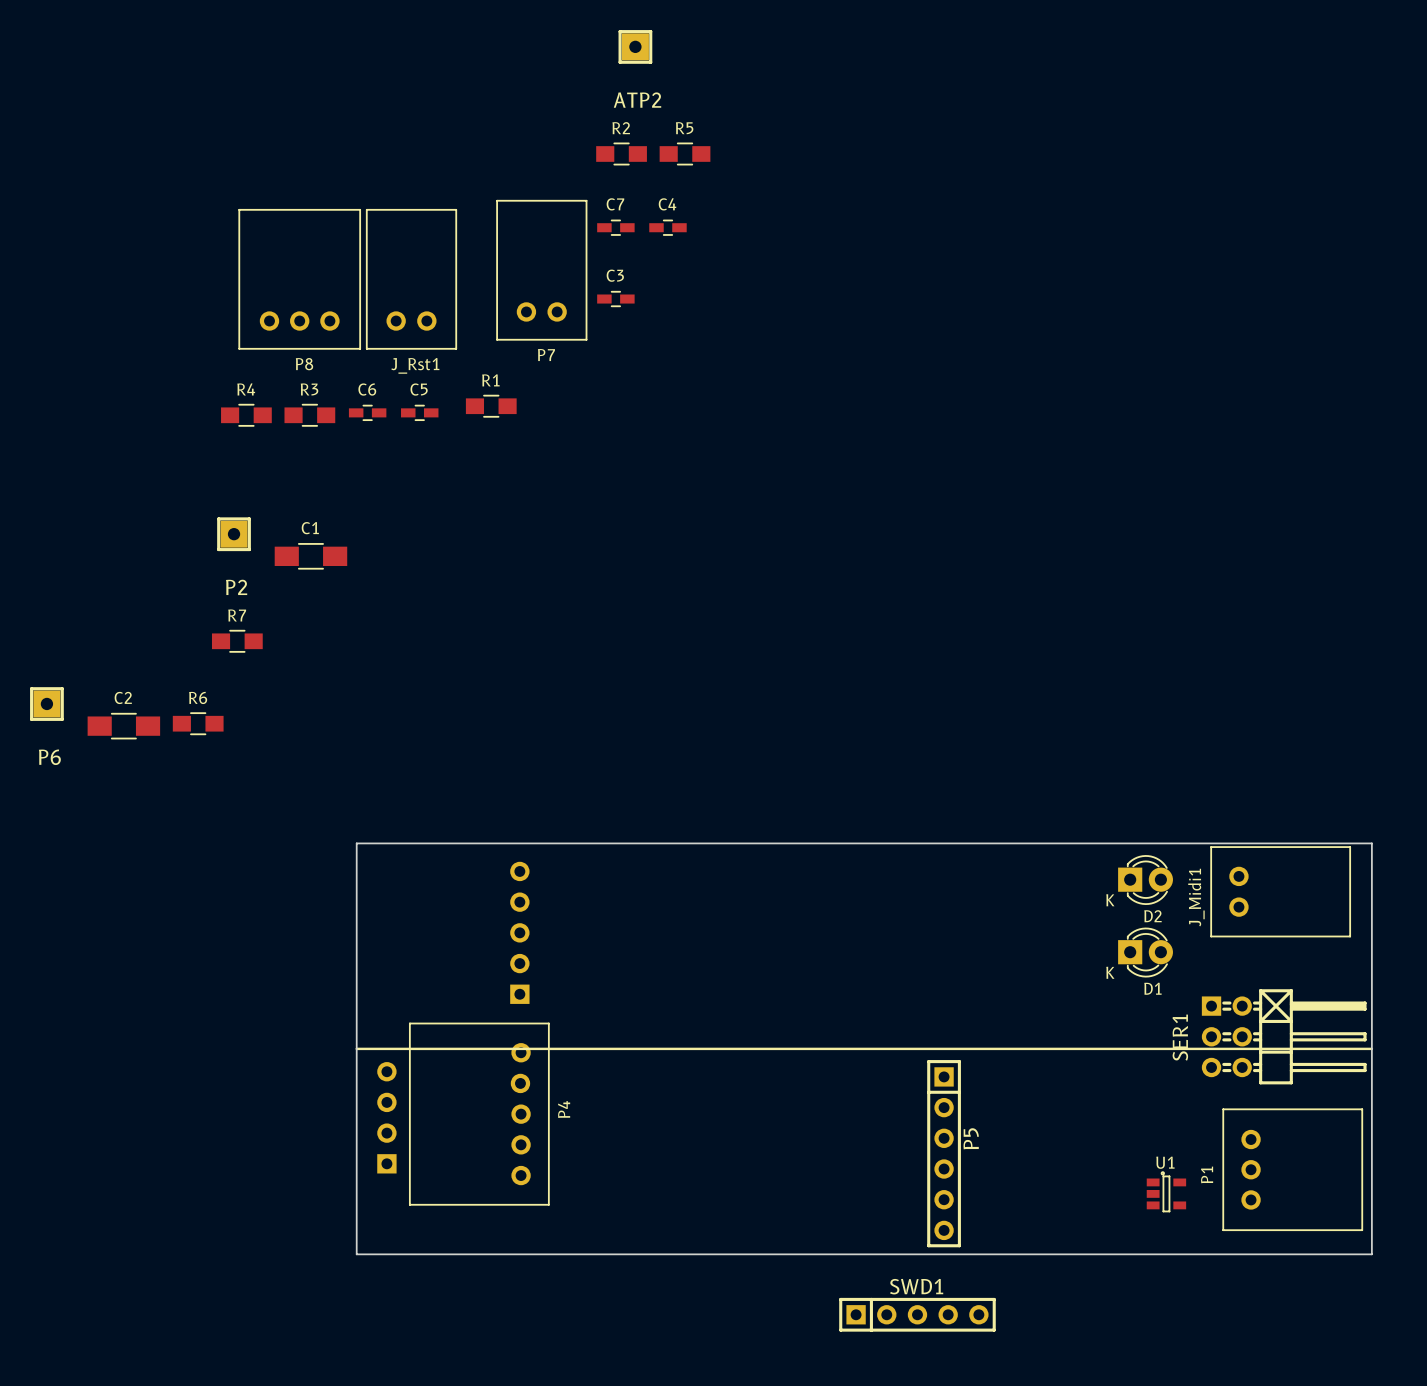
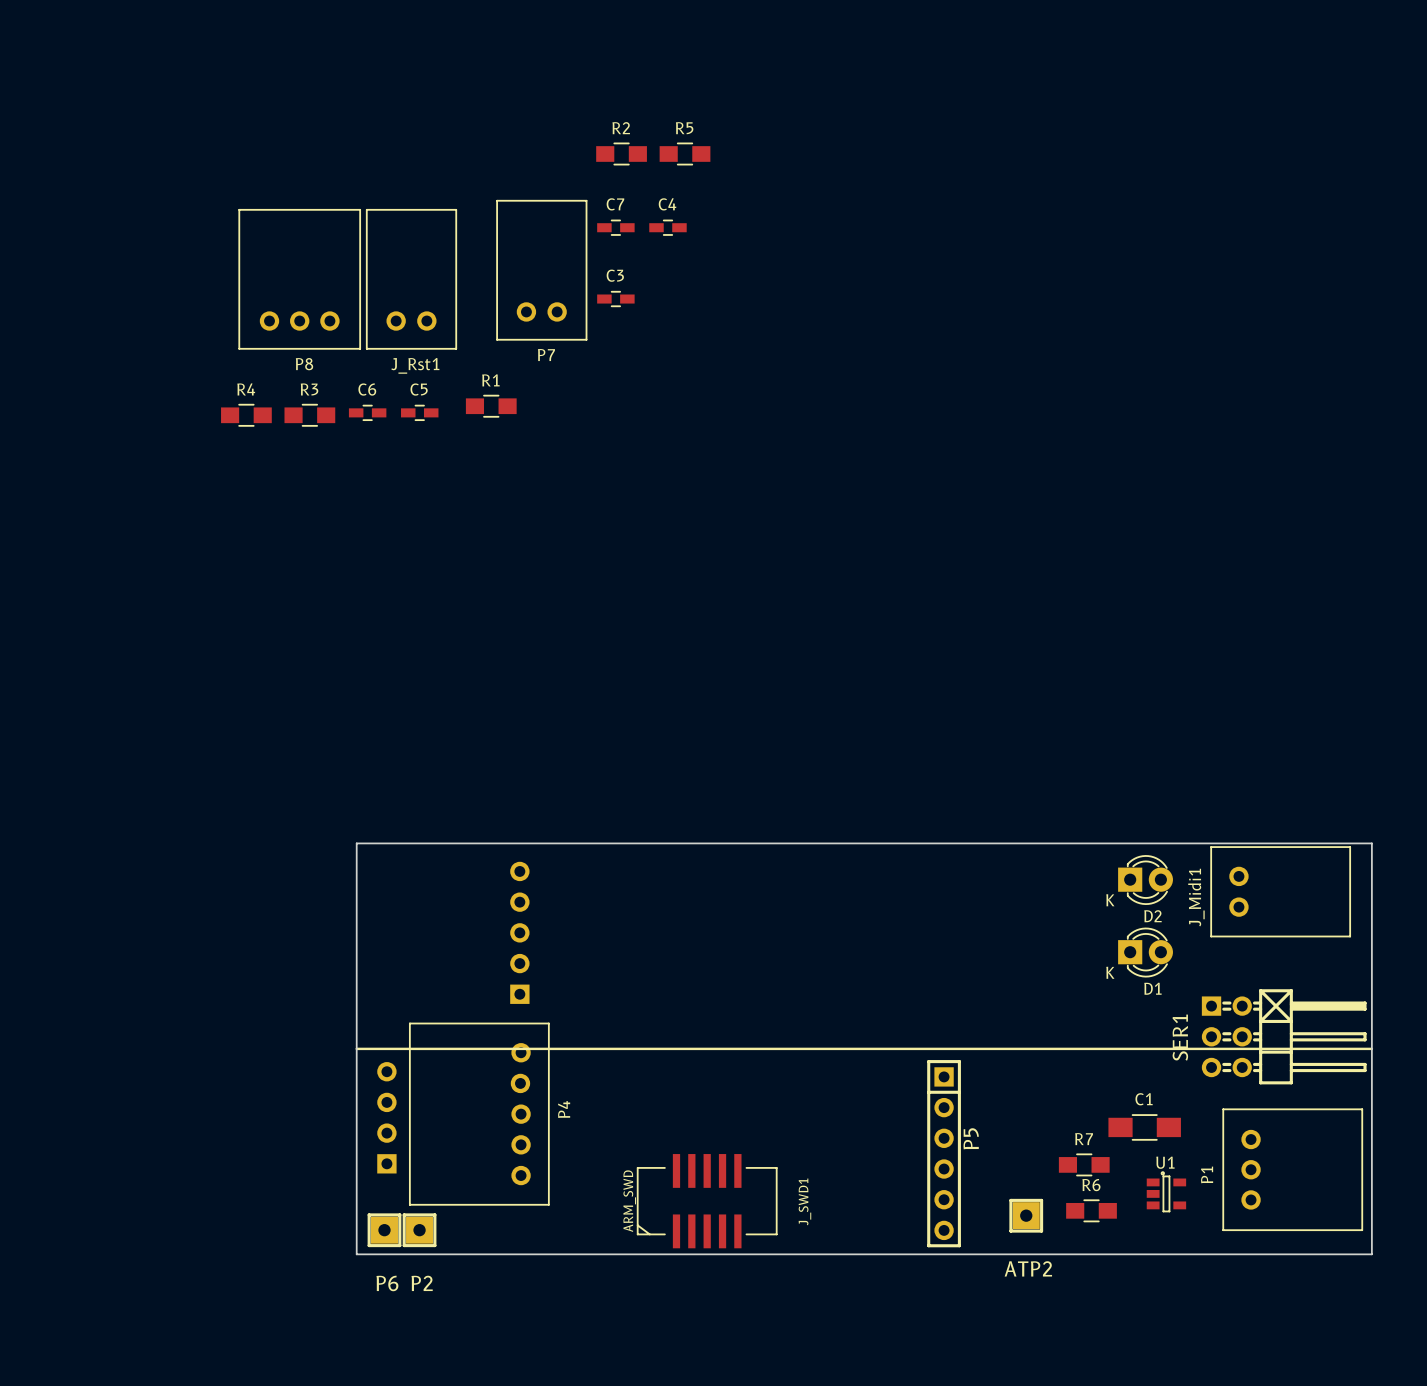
ATP2 position: (635, 46) -> (1026, 1215)
P2 position: (234, 534) -> (419, 1230)
C1 position: (310, 556) -> (1144, 1127)
R7 position: (237, 641) -> (1084, 1164)
P6 position: (46, 704) -> (384, 1230)
R6 position: (198, 723) -> (1091, 1210)
C2: (123, 726) -> none
J_SWD1: none -> ARM_SWD (707, 1201)
SWD1: (917, 1314) -> none

